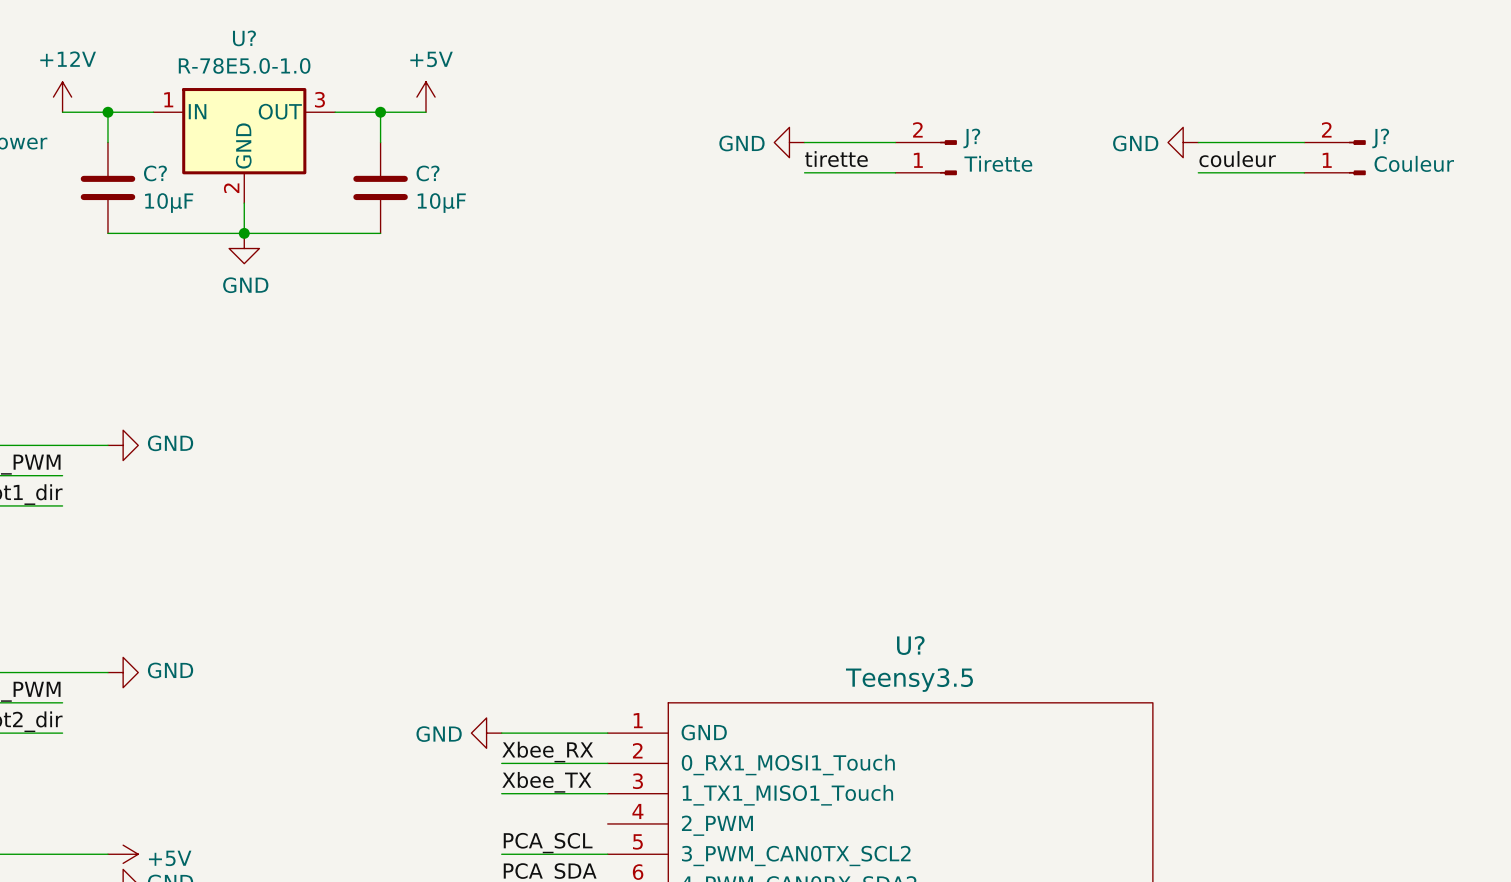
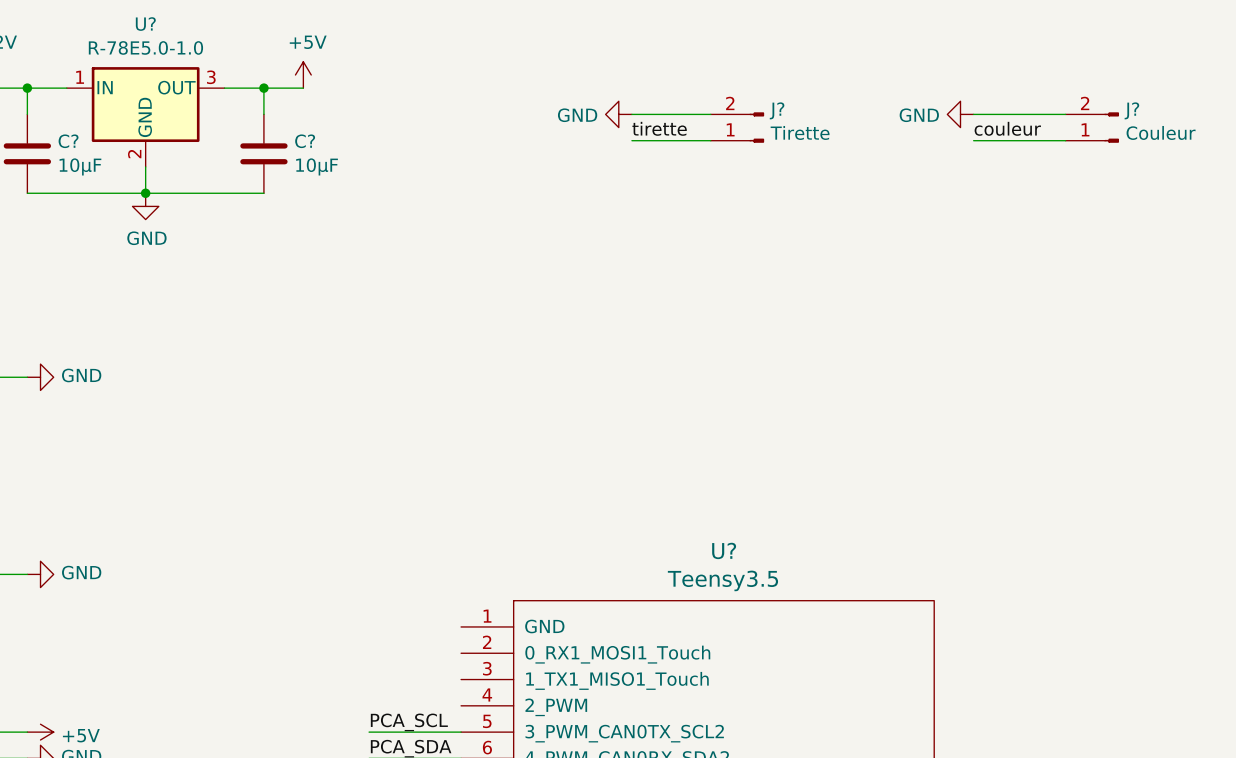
power symbol: GND (486, 733) -> none
wire: (501, 733) (607, 733) -> none
label: Xbee_RX (547, 752) -> none
wire: (501, 763) (607, 763) -> none
label: Xbee_TX (546, 782) -> none
wire: (501, 793) (607, 793) -> none

